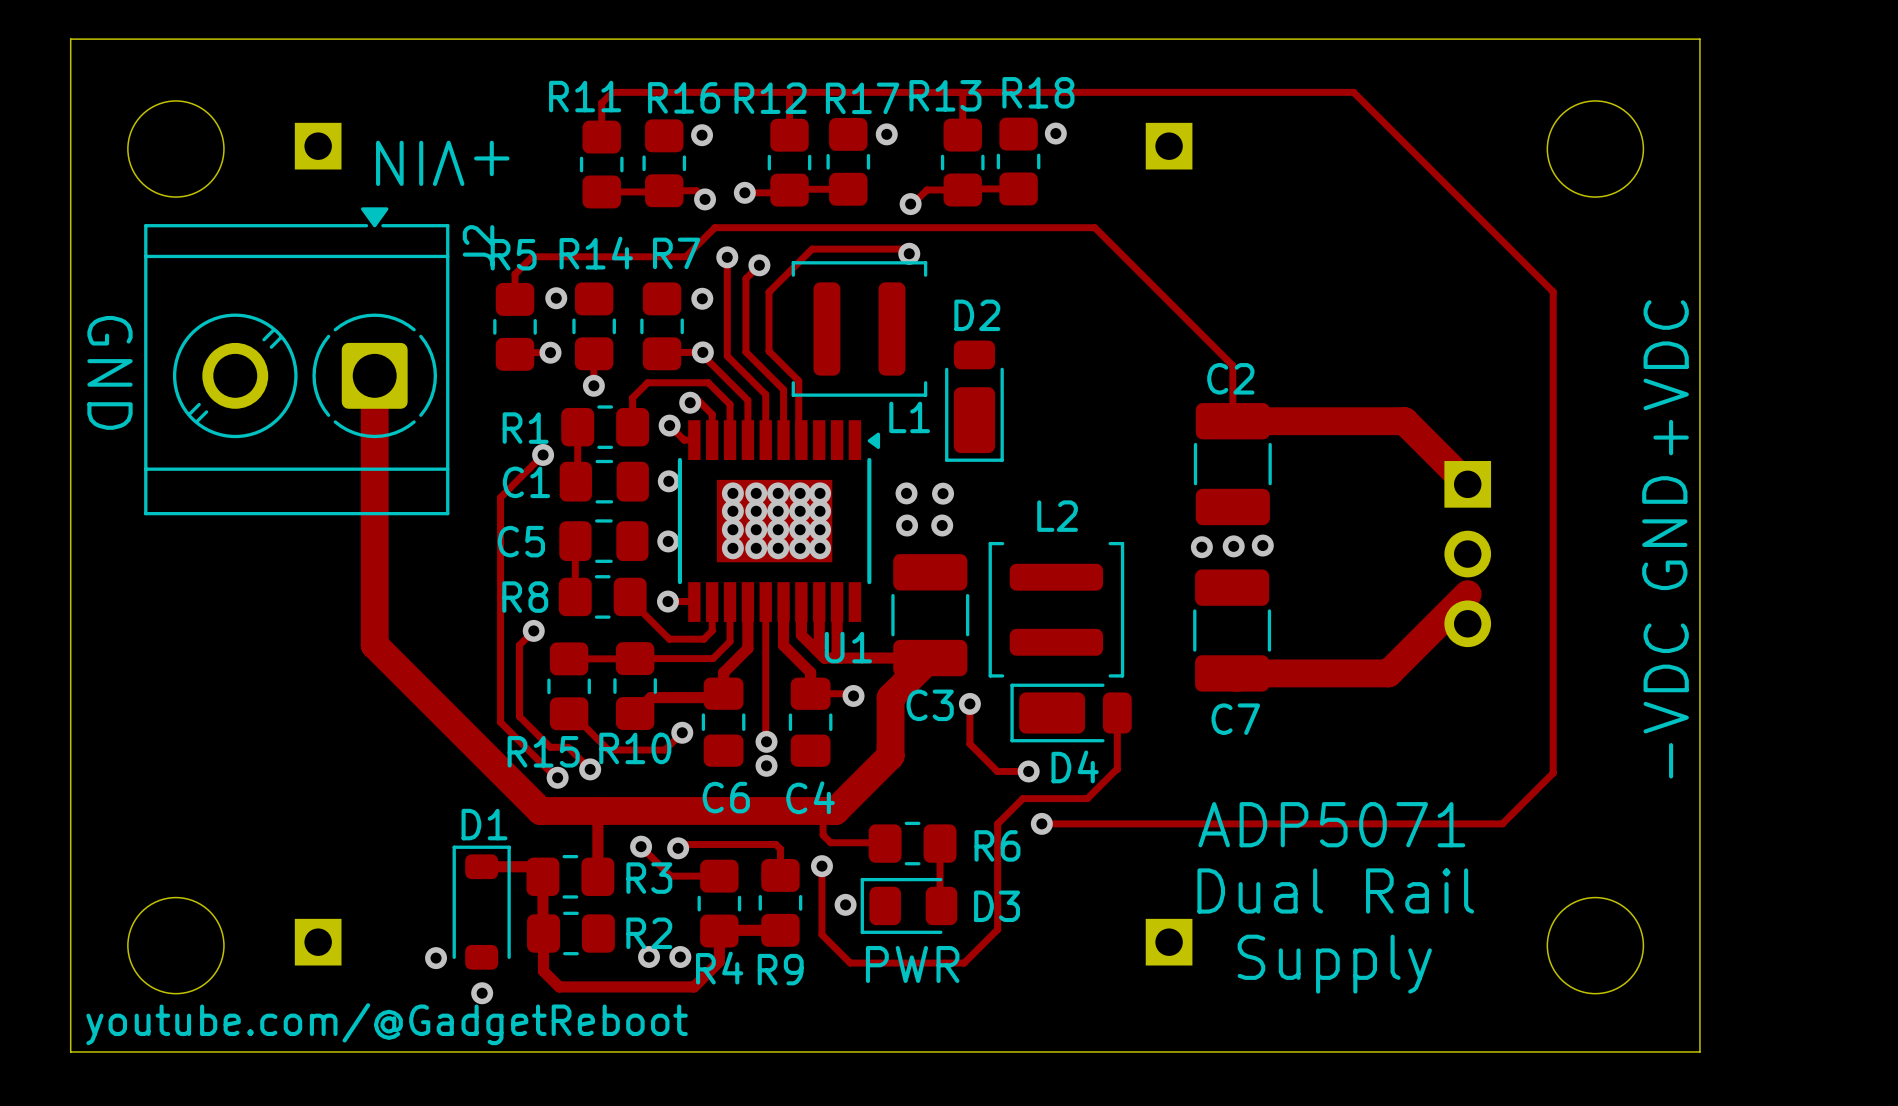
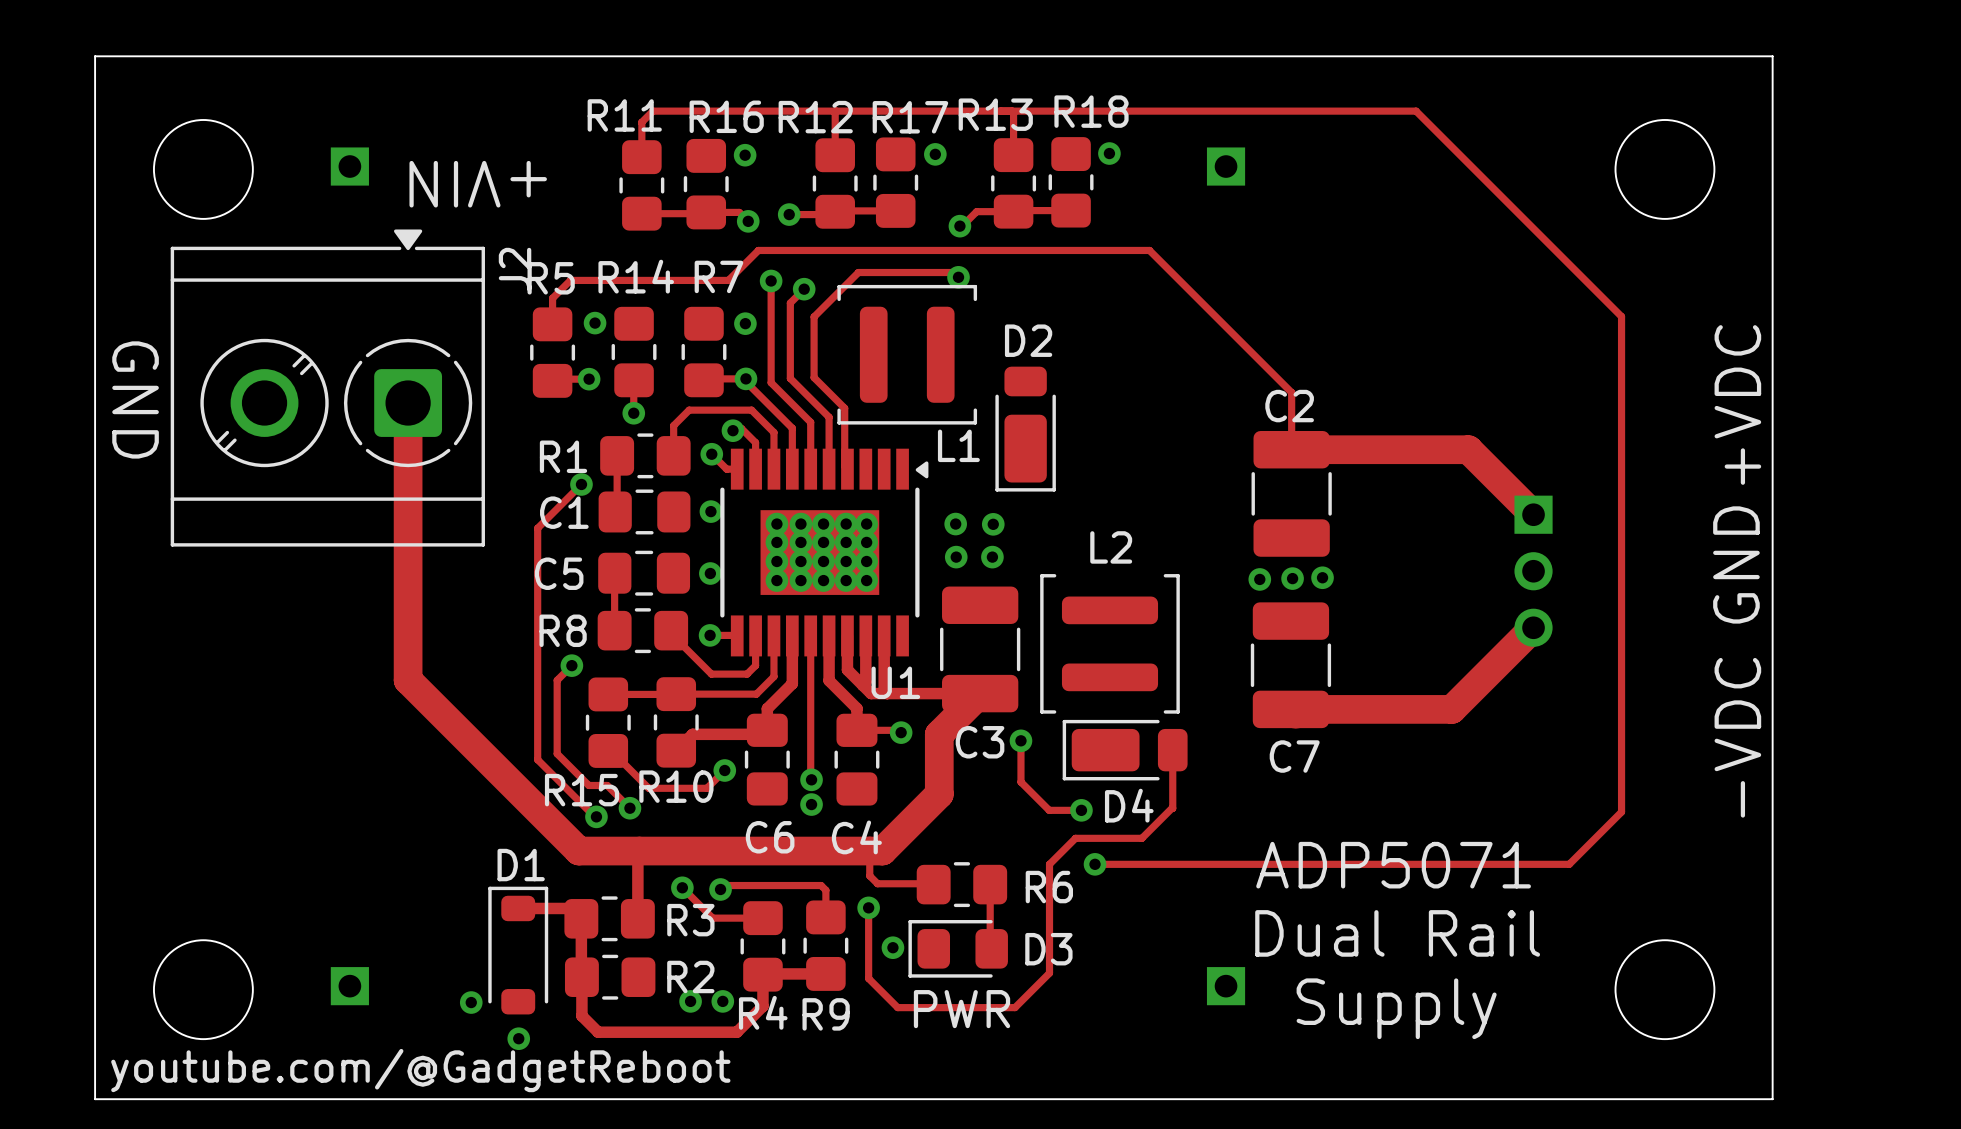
part footprint: [294, 122, 342, 170] -> [330, 147, 369, 186]
part footprint: [1145, 122, 1193, 170] -> [1206, 147, 1246, 186]
part footprint: [1444, 461, 1492, 648] -> [1514, 495, 1553, 647]
part footprint: [294, 918, 342, 966] -> [330, 967, 369, 1006]
part footprint: [1145, 918, 1193, 966] -> [1206, 967, 1246, 1006]

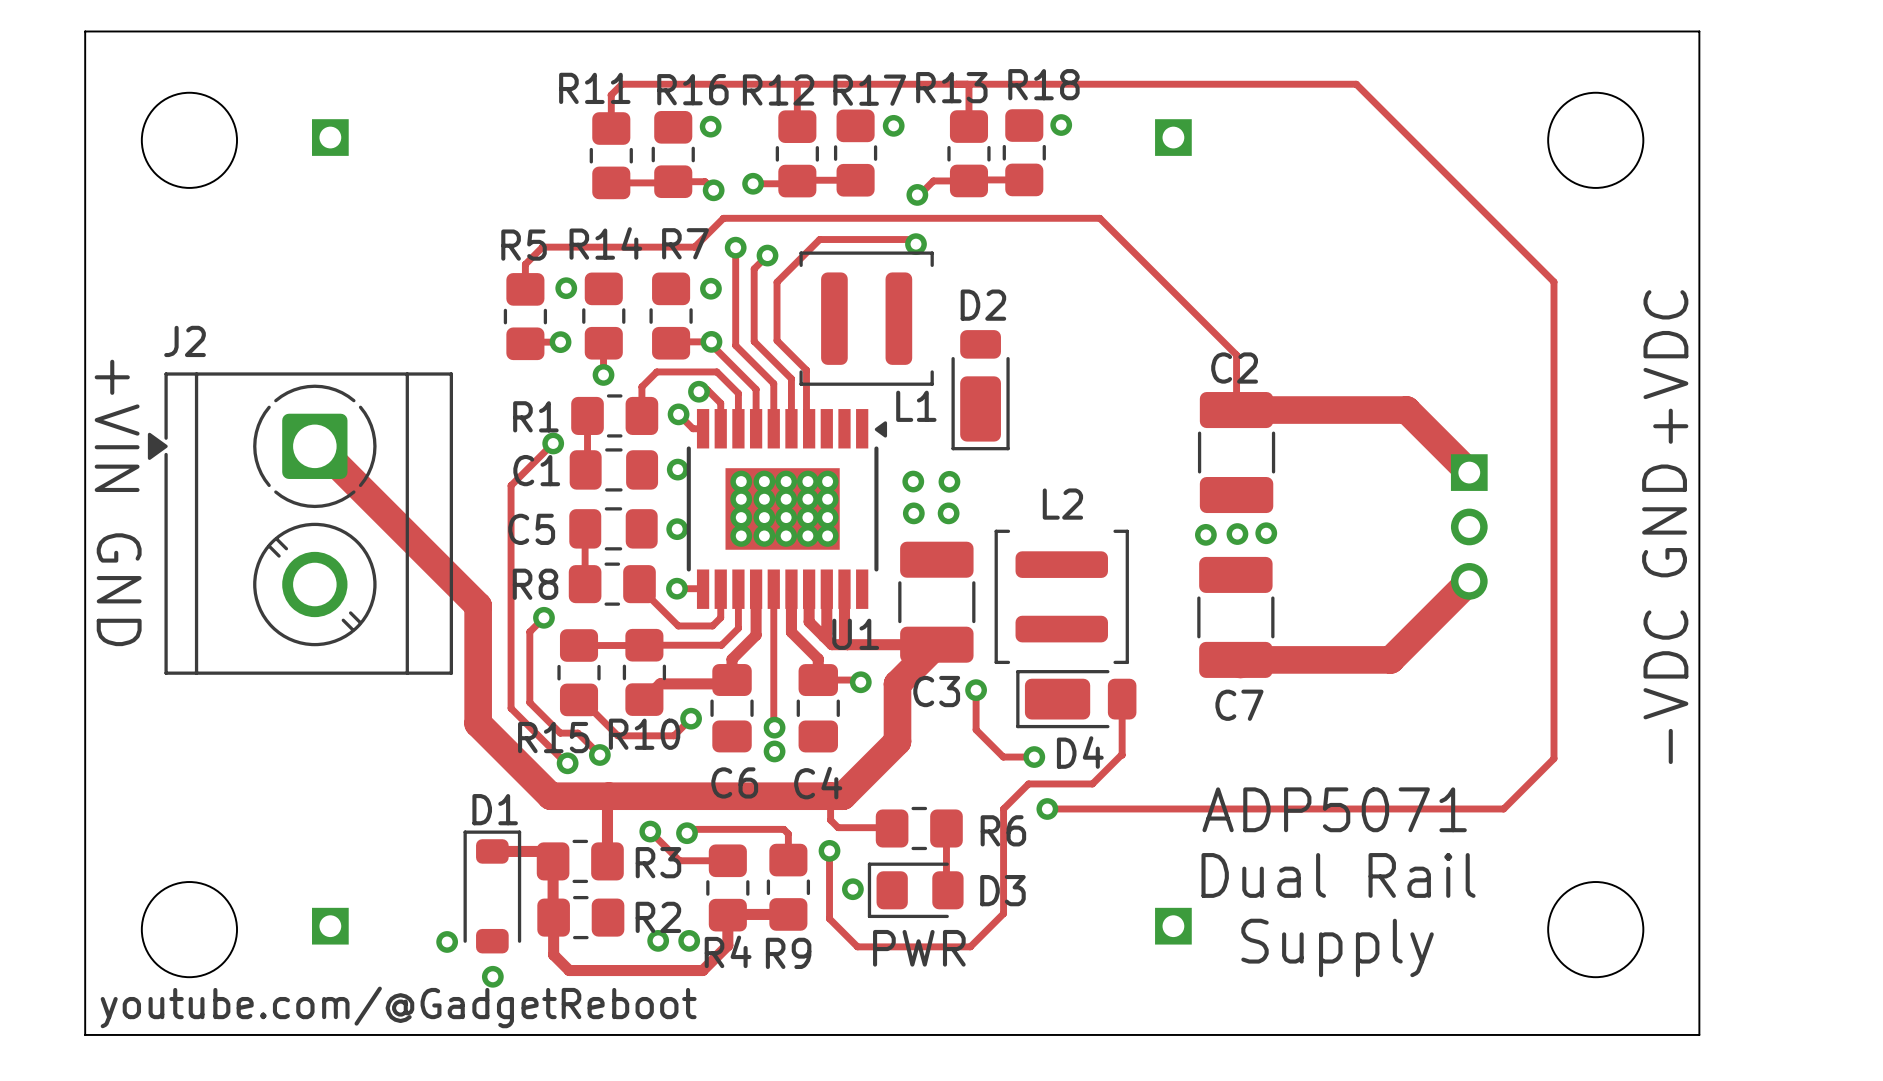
text rotation: 0° (478, 184) -> 90° counterclockwise (117, 425)
text position: +VIN (478, 184) -> +VIN (117, 425)
J2 rotation: 0° (327, 388) -> 90° counterclockwise (300, 523)
text position: GND (135, 399) -> GND (119, 589)
track: (408, 403) (408, 680) (503, 775) -> (314, 446) (318, 446) (478, 605) (478, 723)

